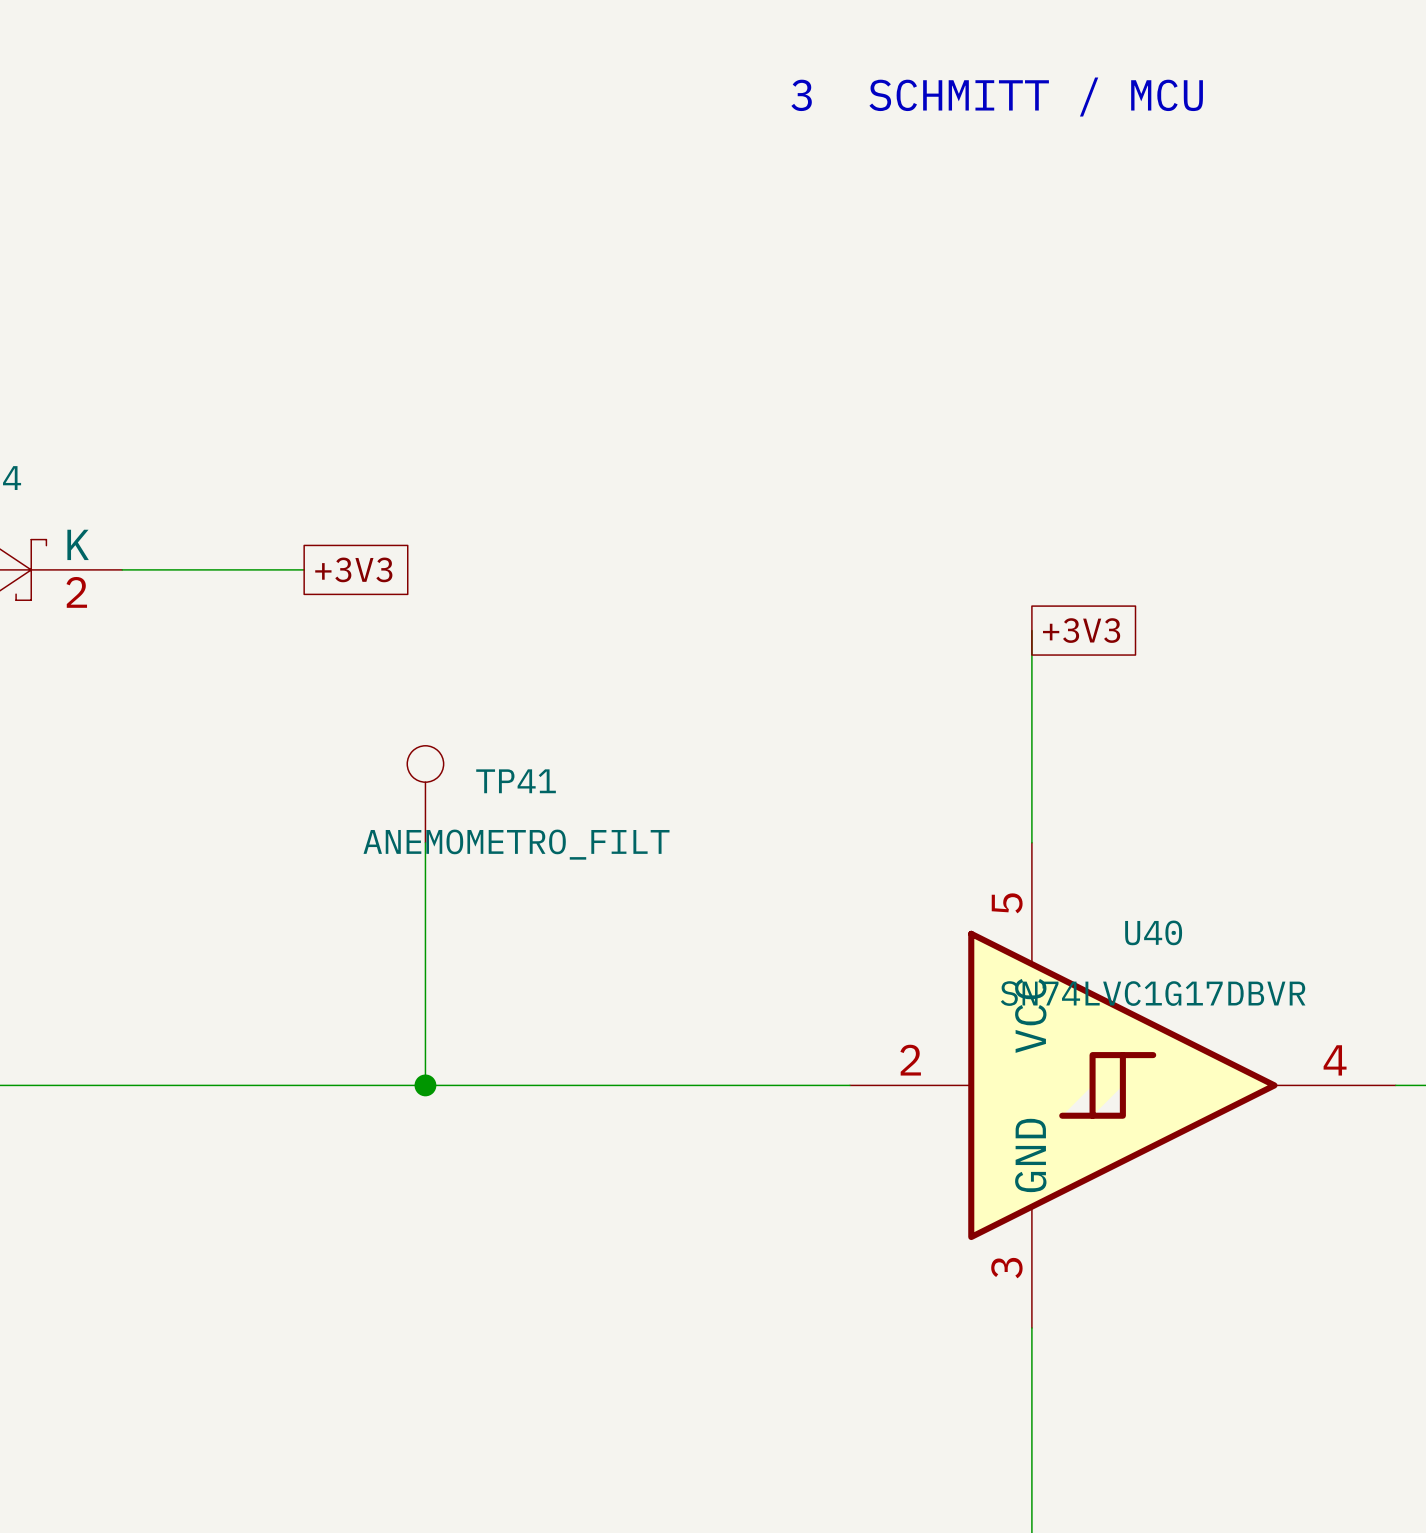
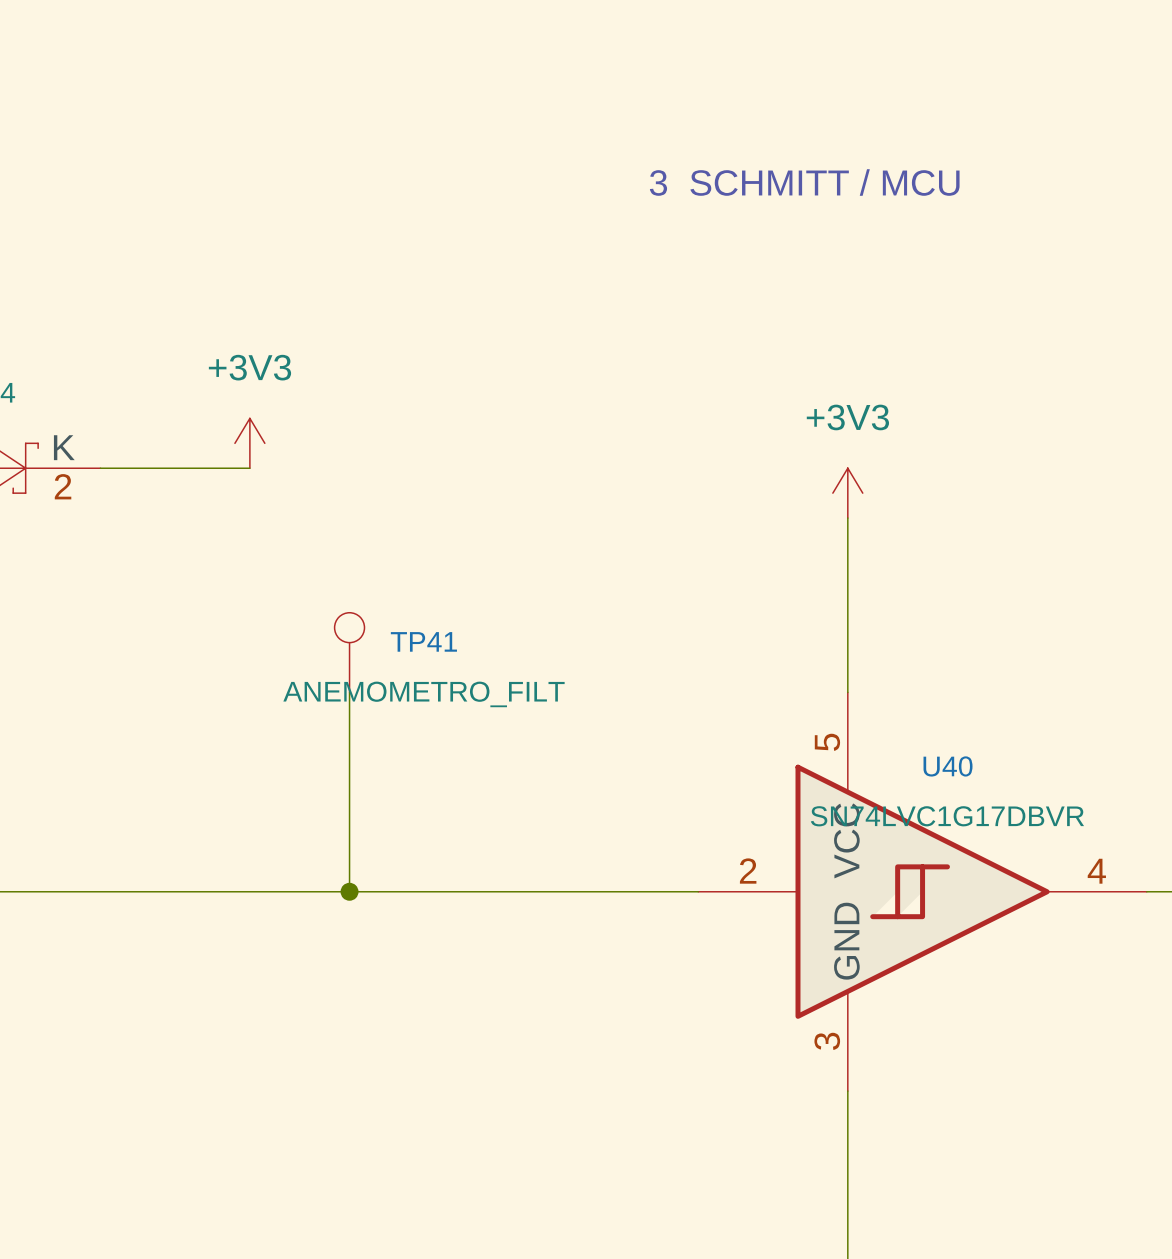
text position: 3 SCHMITT / MCU (997, 97) -> 3 SCHMITT / MCU (804, 182)
power symbol: none -> +3V3 (249, 443)
global label: +3V3 (353, 569) -> none
power symbol: none -> +3V3 (847, 493)
global label: +3V3 (1081, 630) -> none

